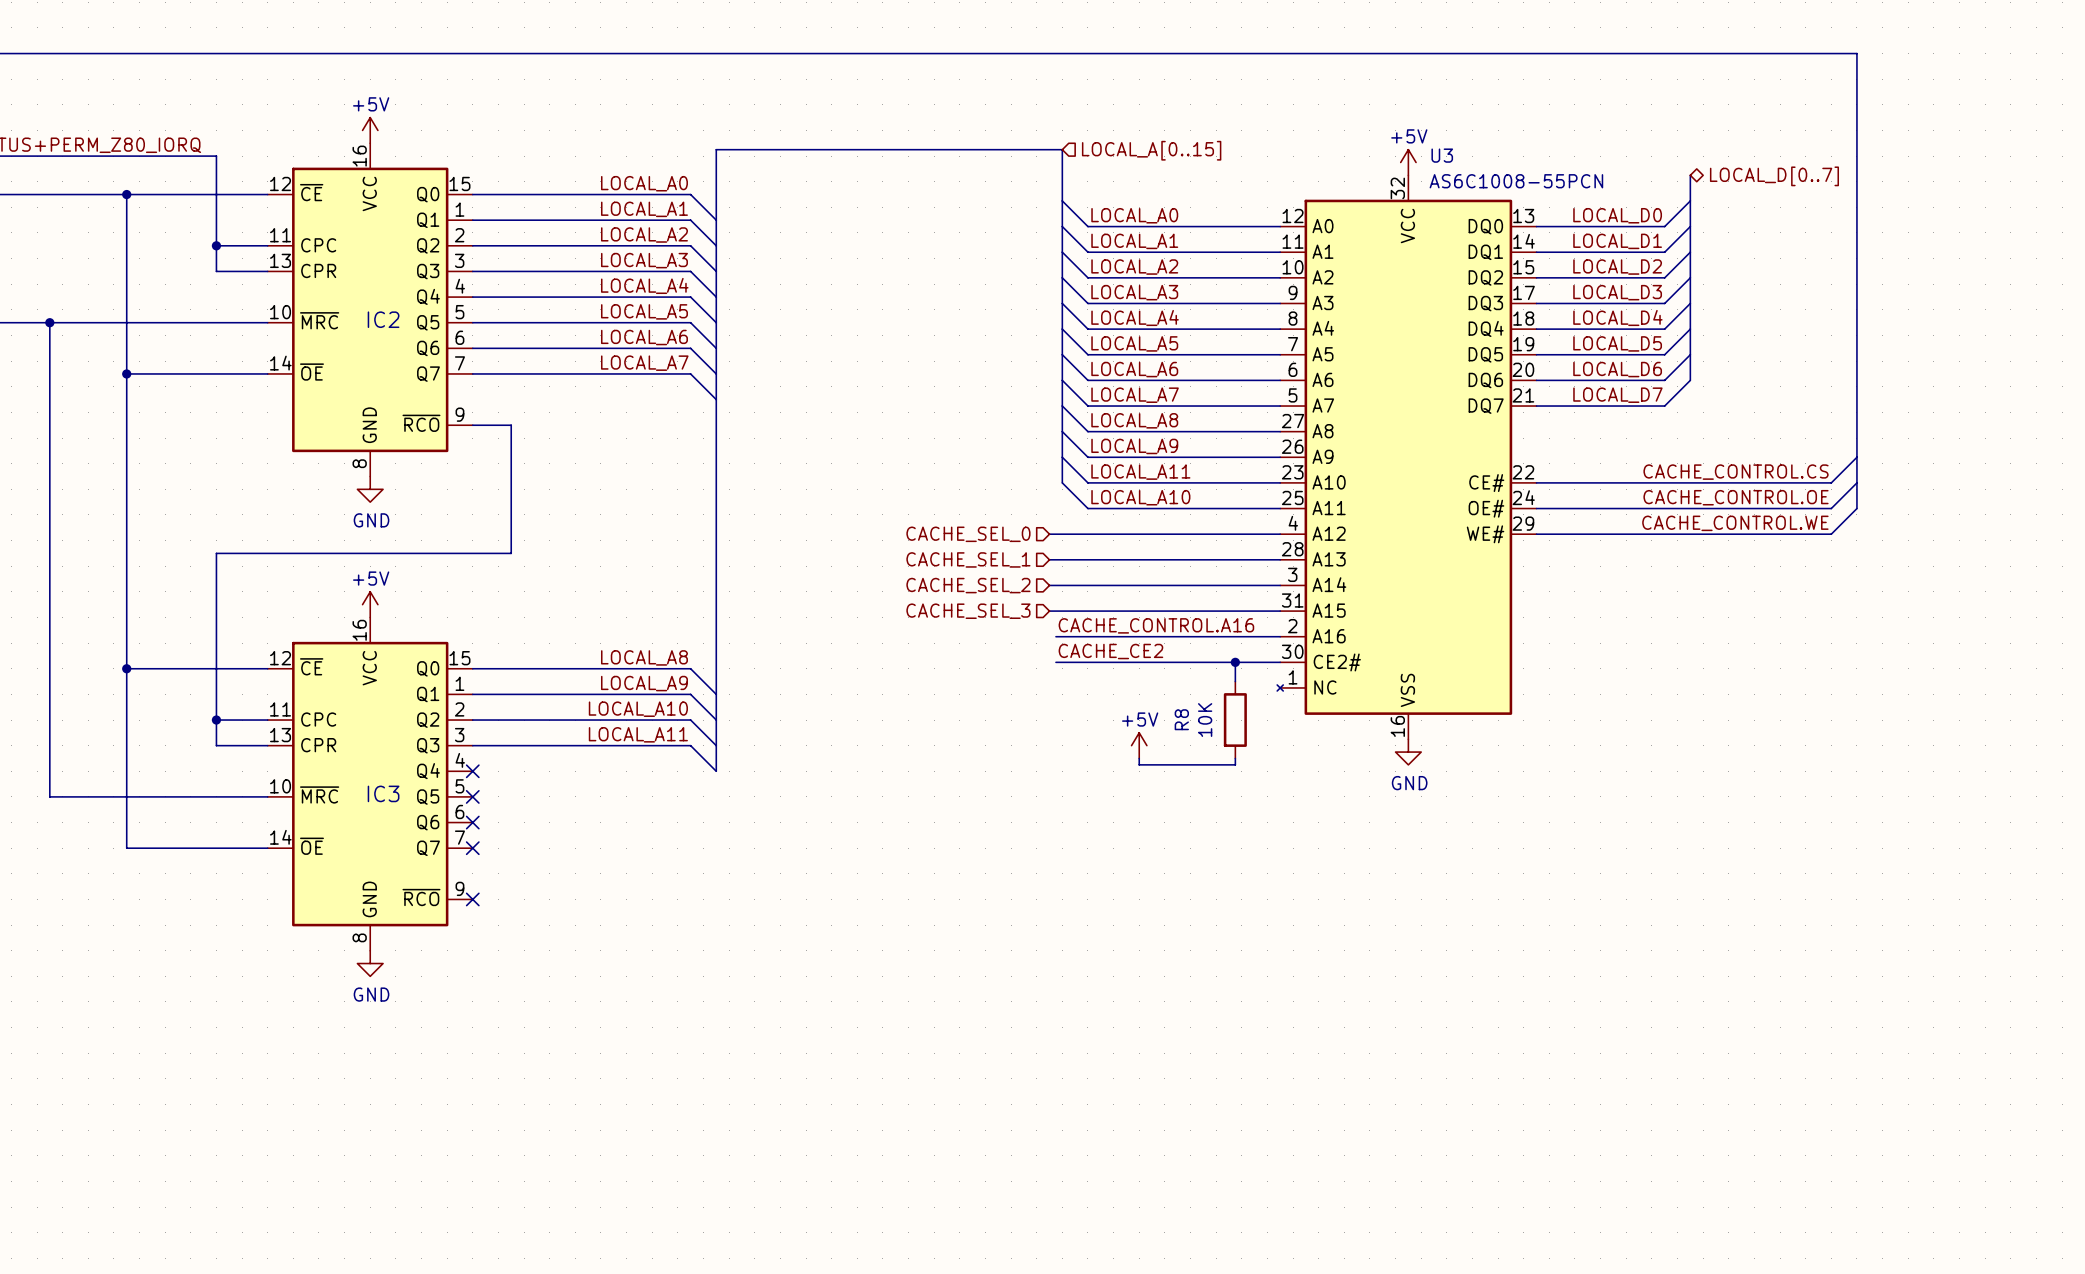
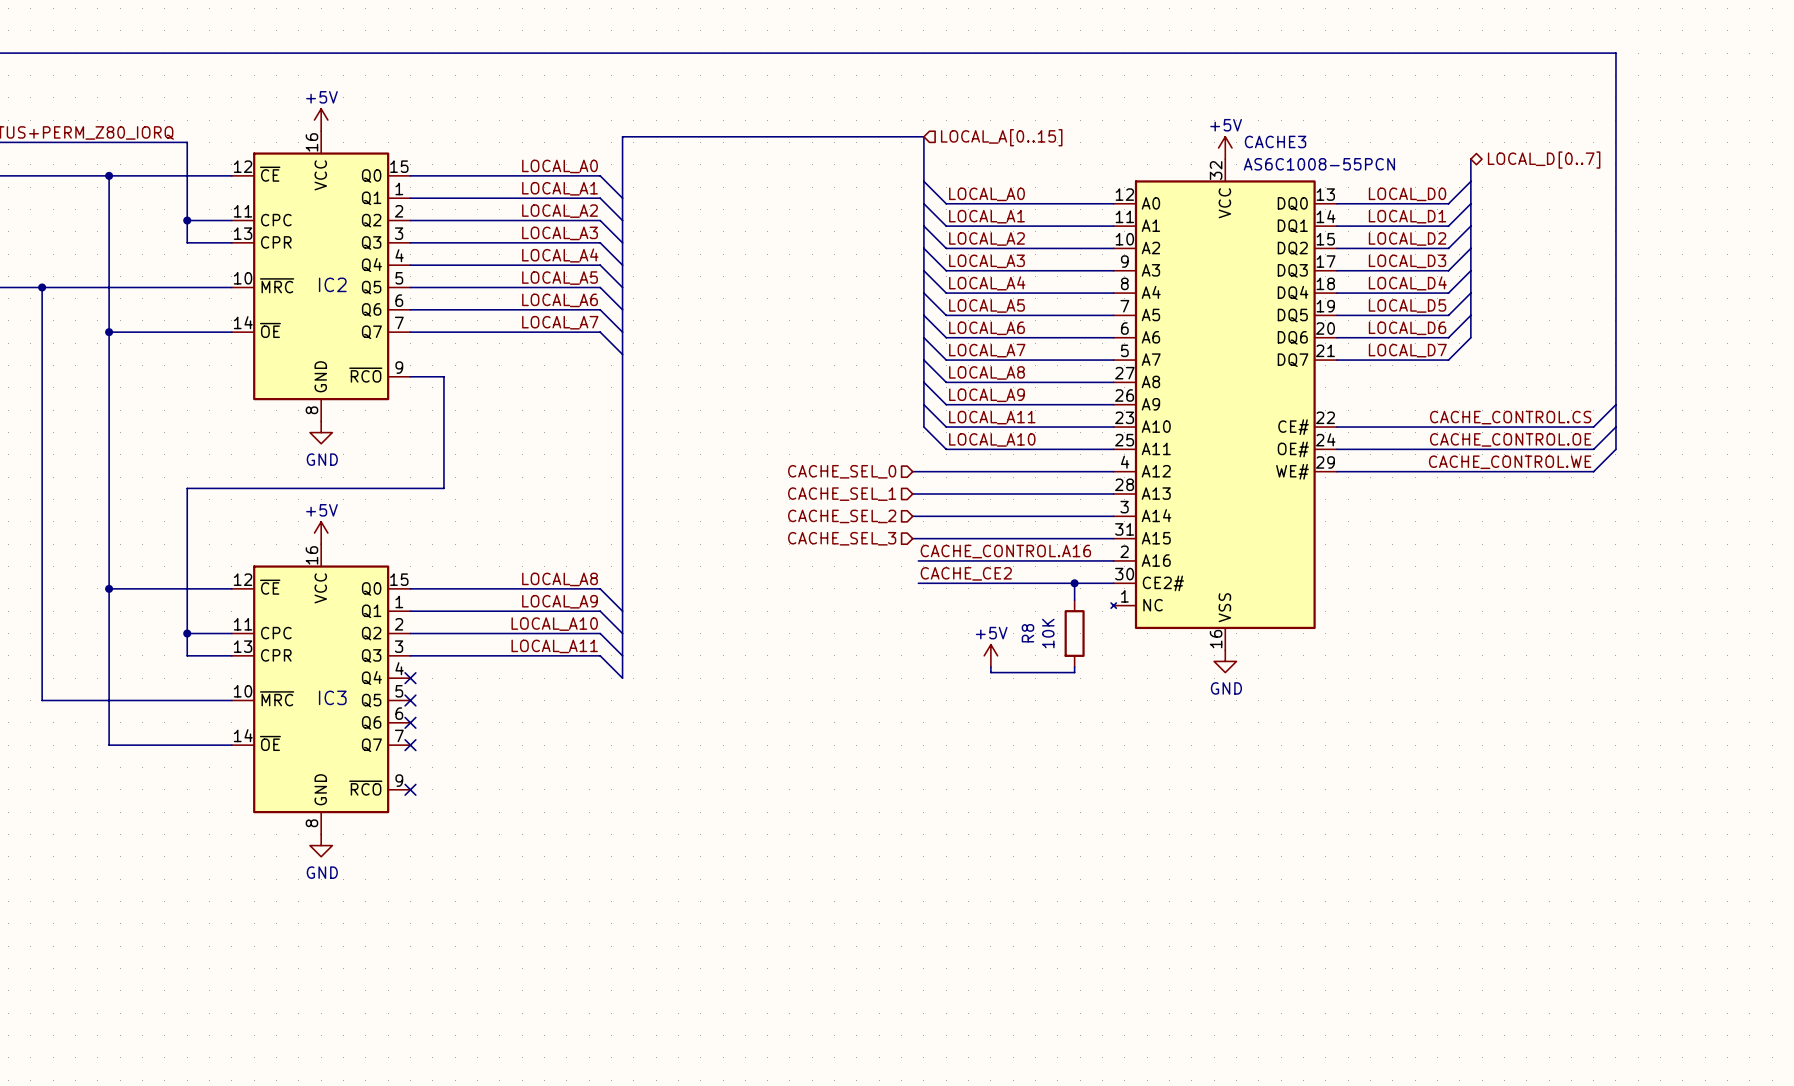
U3 name: U3 (1442, 155) -> CACHE3 (1275, 141)

